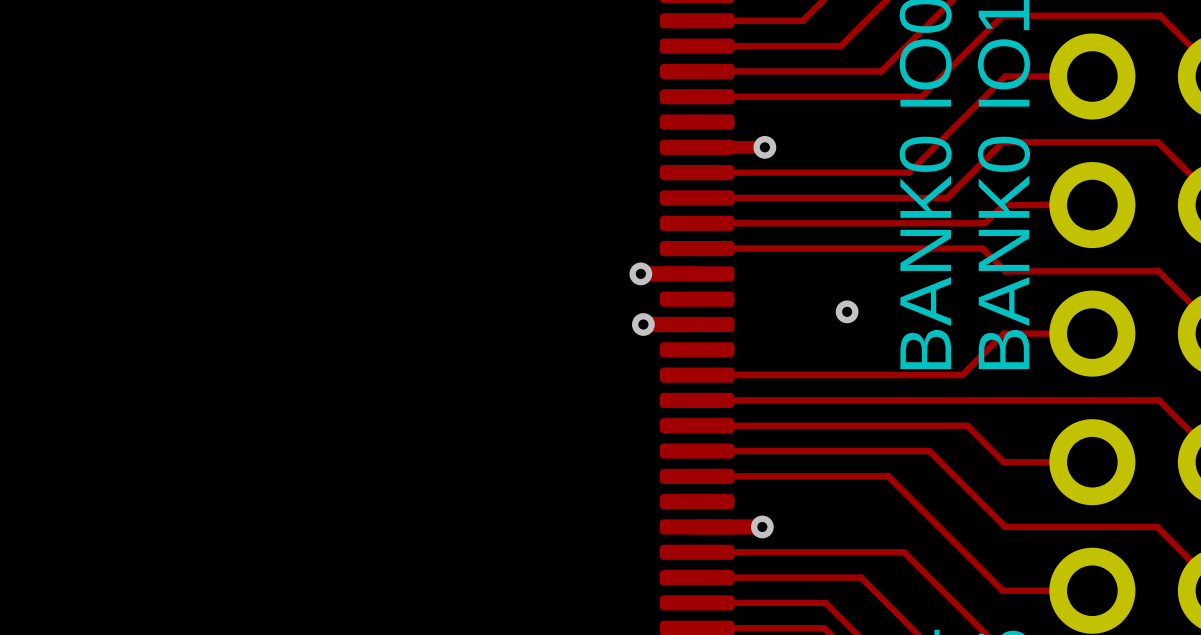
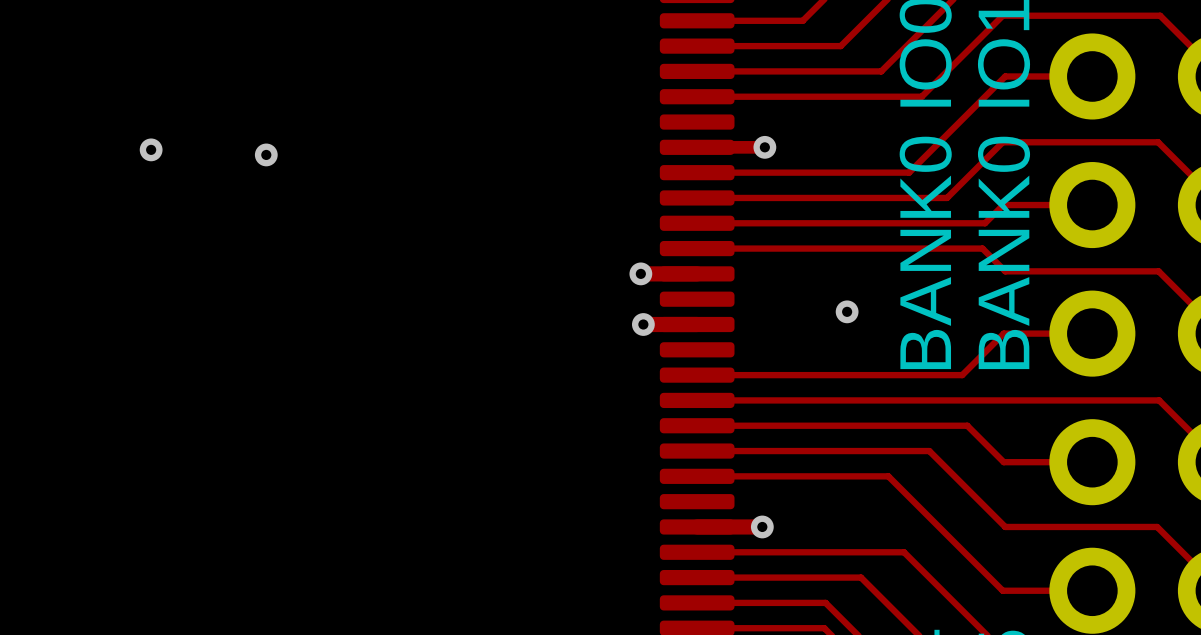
via: none -> (151, 149)
via: none -> (266, 154)

